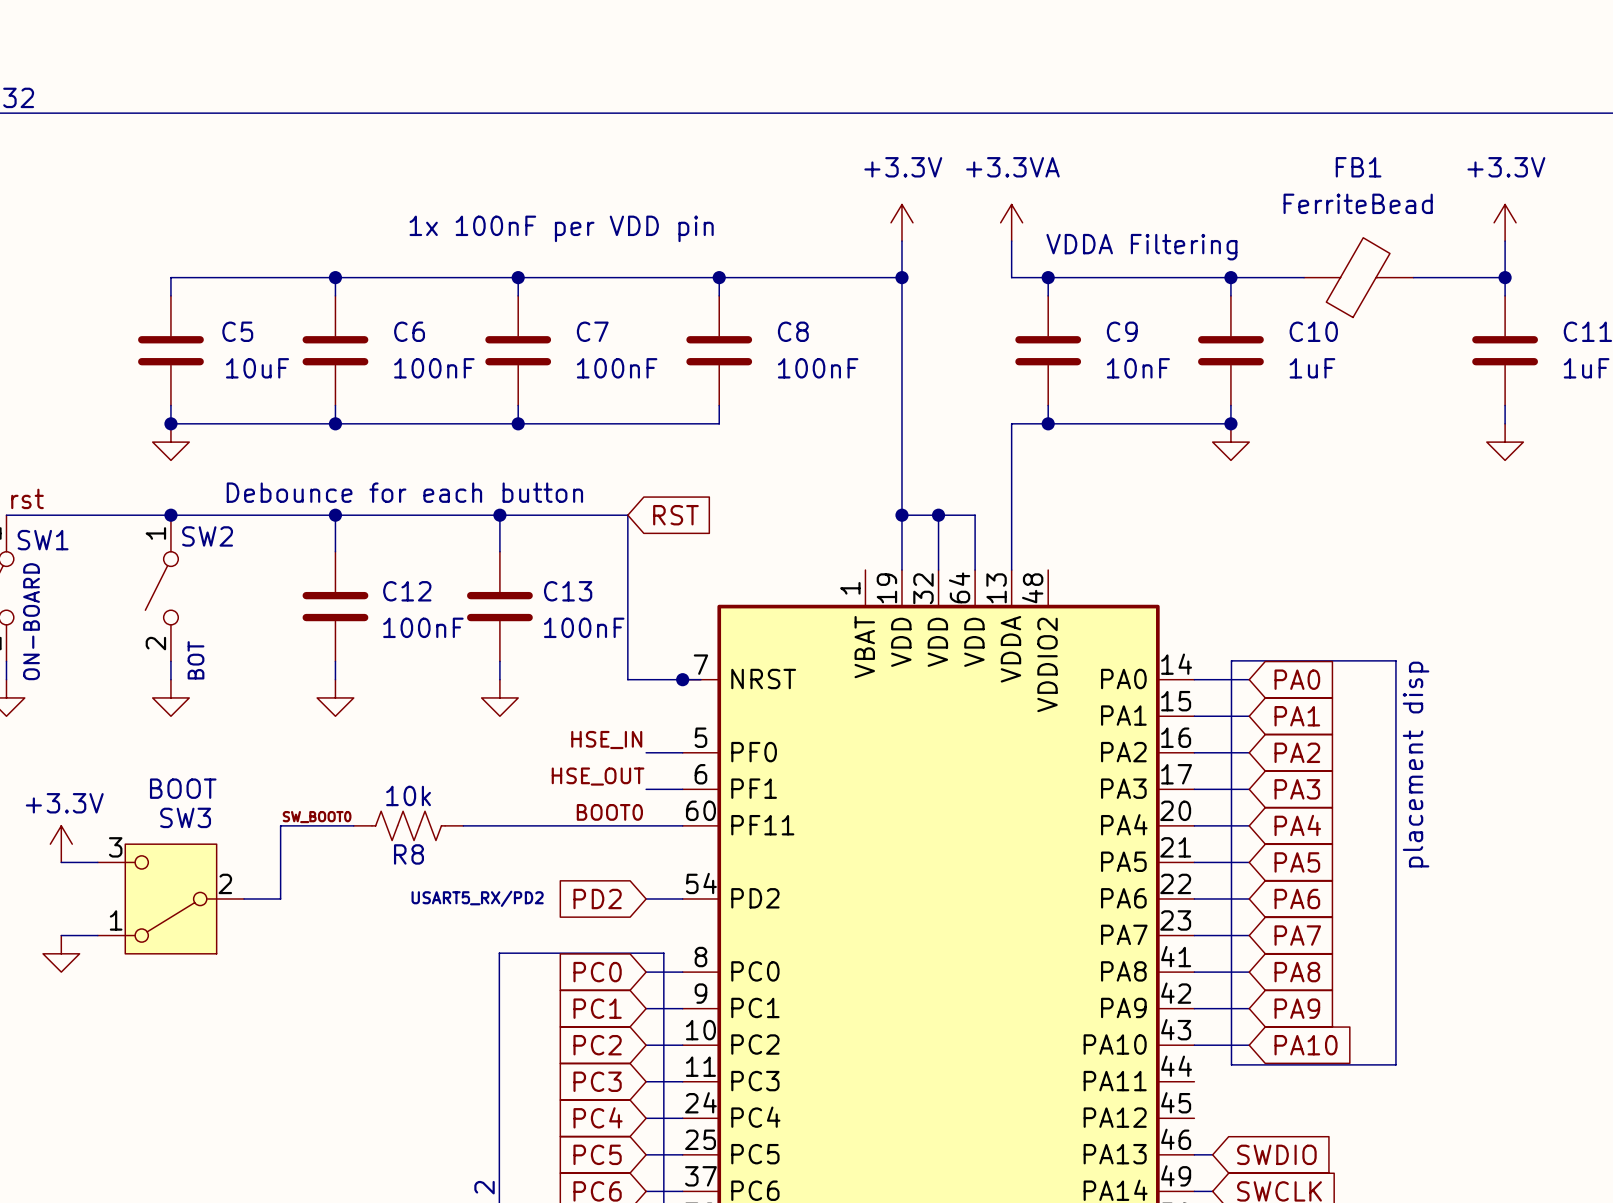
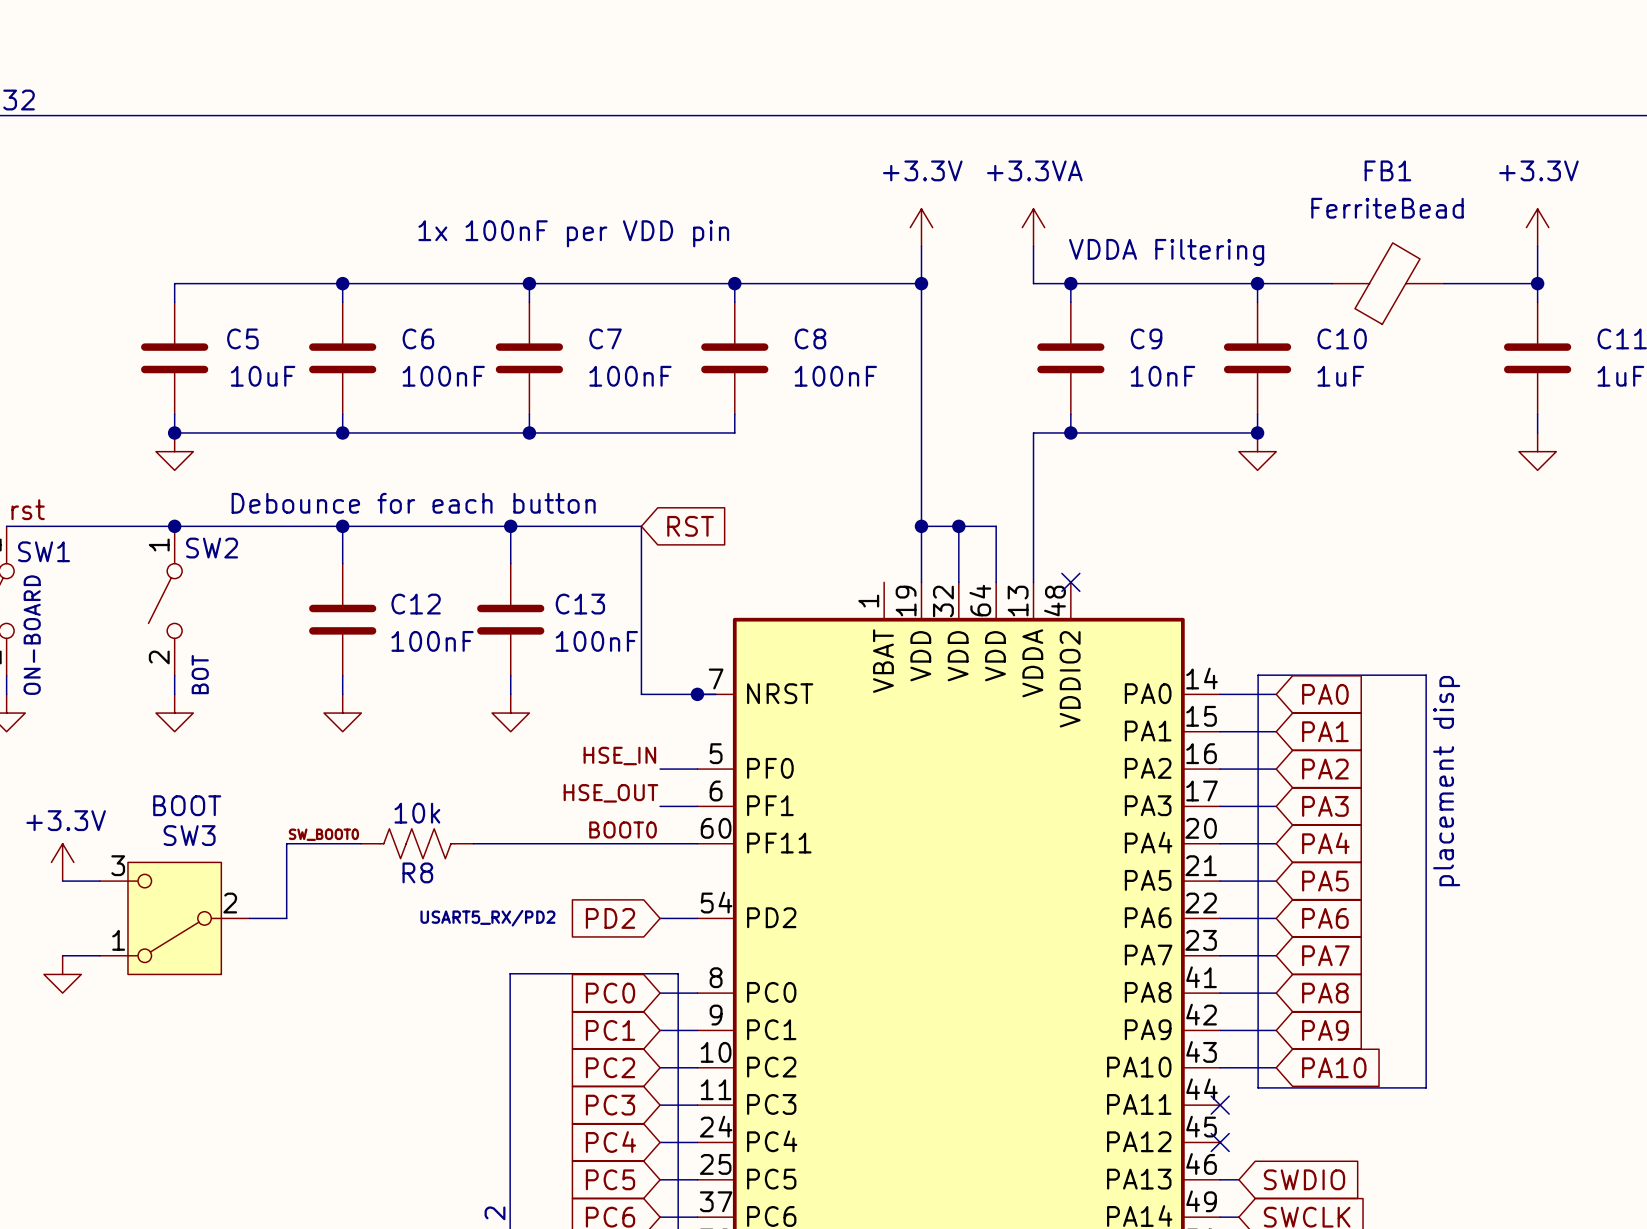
no-connect mark: none -> (1070, 582)
no-connect mark: none -> (1220, 1105)
no-connect mark: none -> (1220, 1142)

